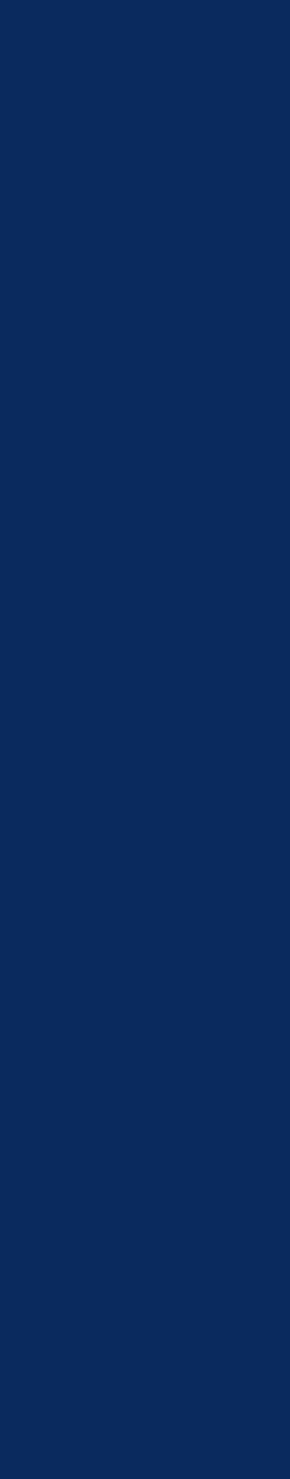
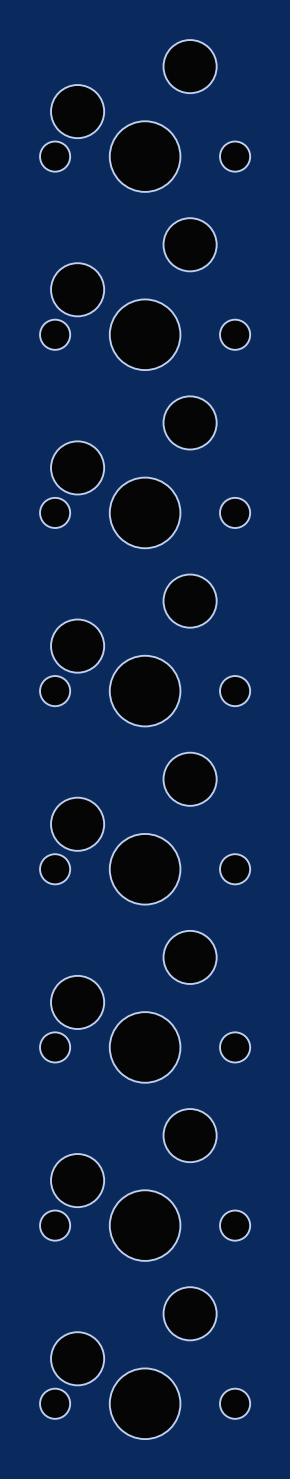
part: none -> (145, 115)
part: none -> (145, 294)
part: none -> (145, 472)
part: none -> (145, 650)
part: none -> (145, 828)
part: none -> (145, 1006)
part: none -> (145, 1184)
part: none -> (145, 1363)

